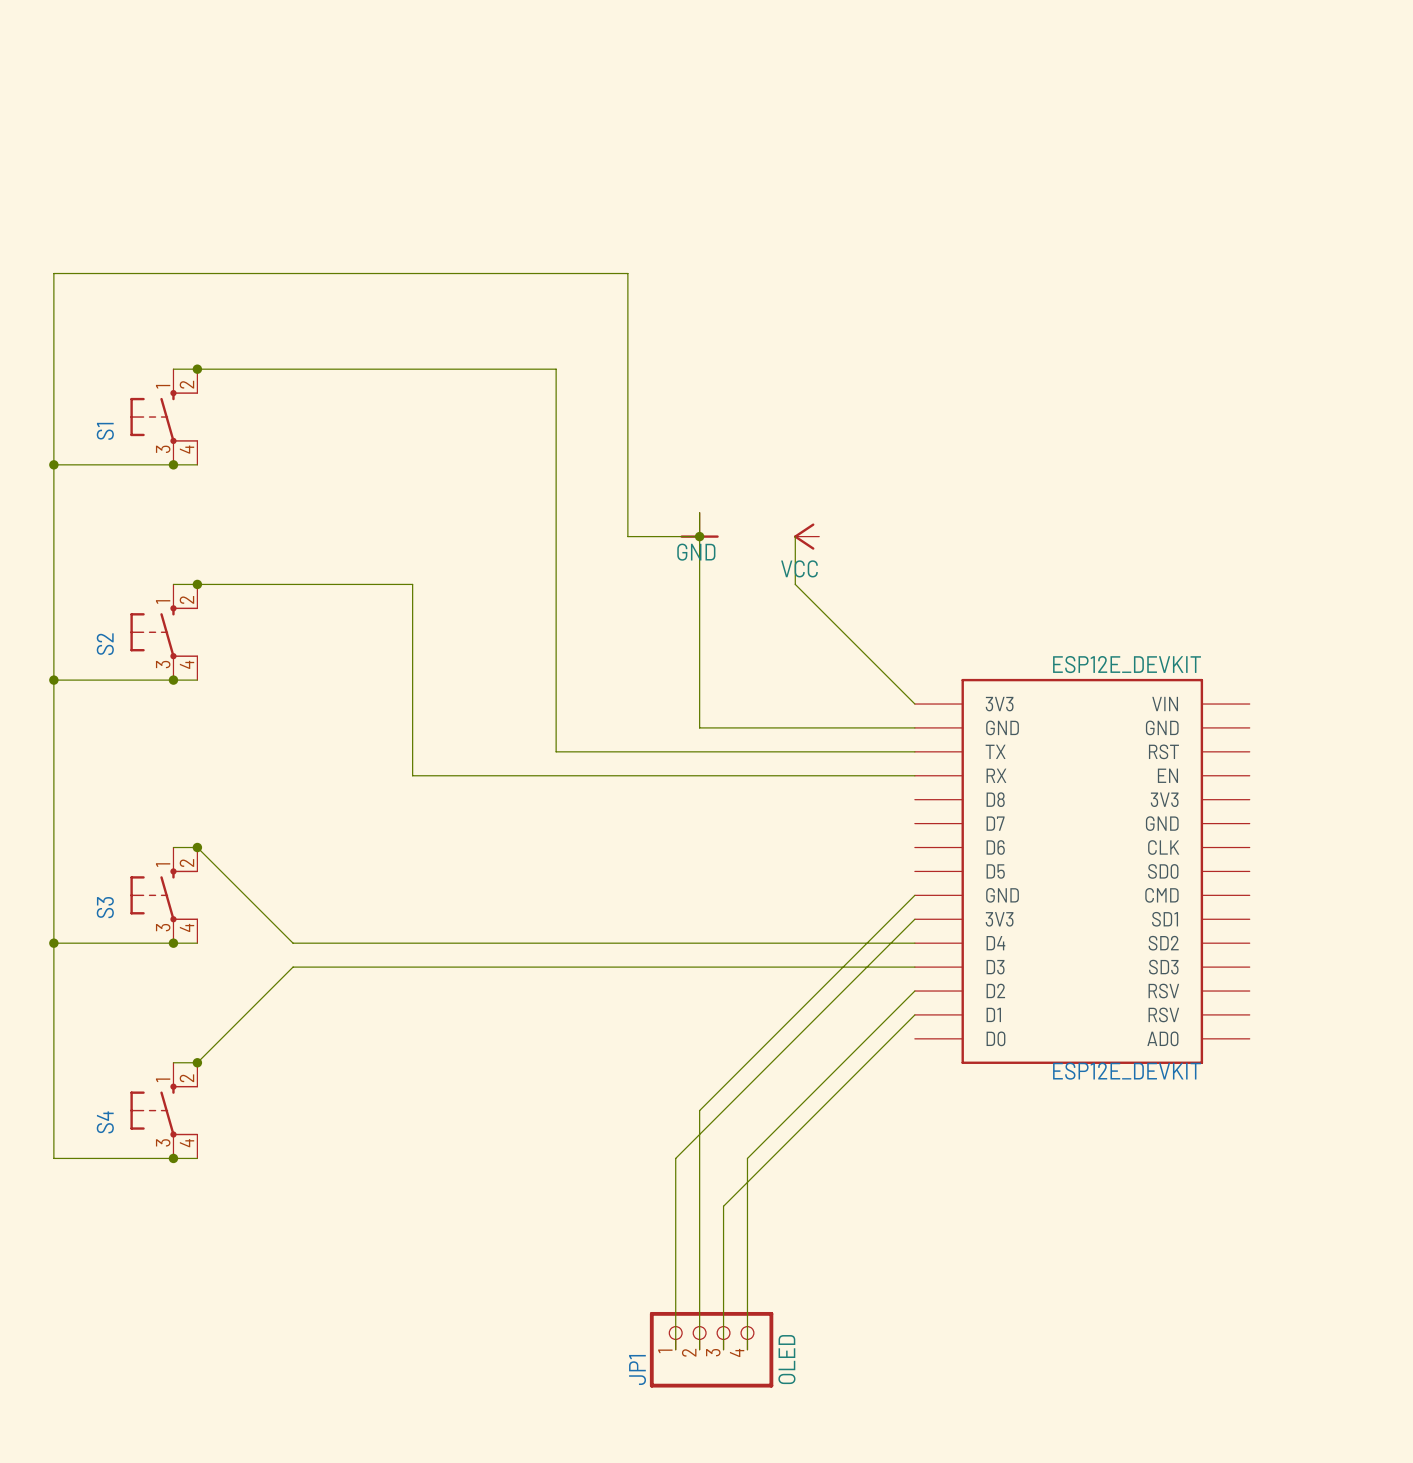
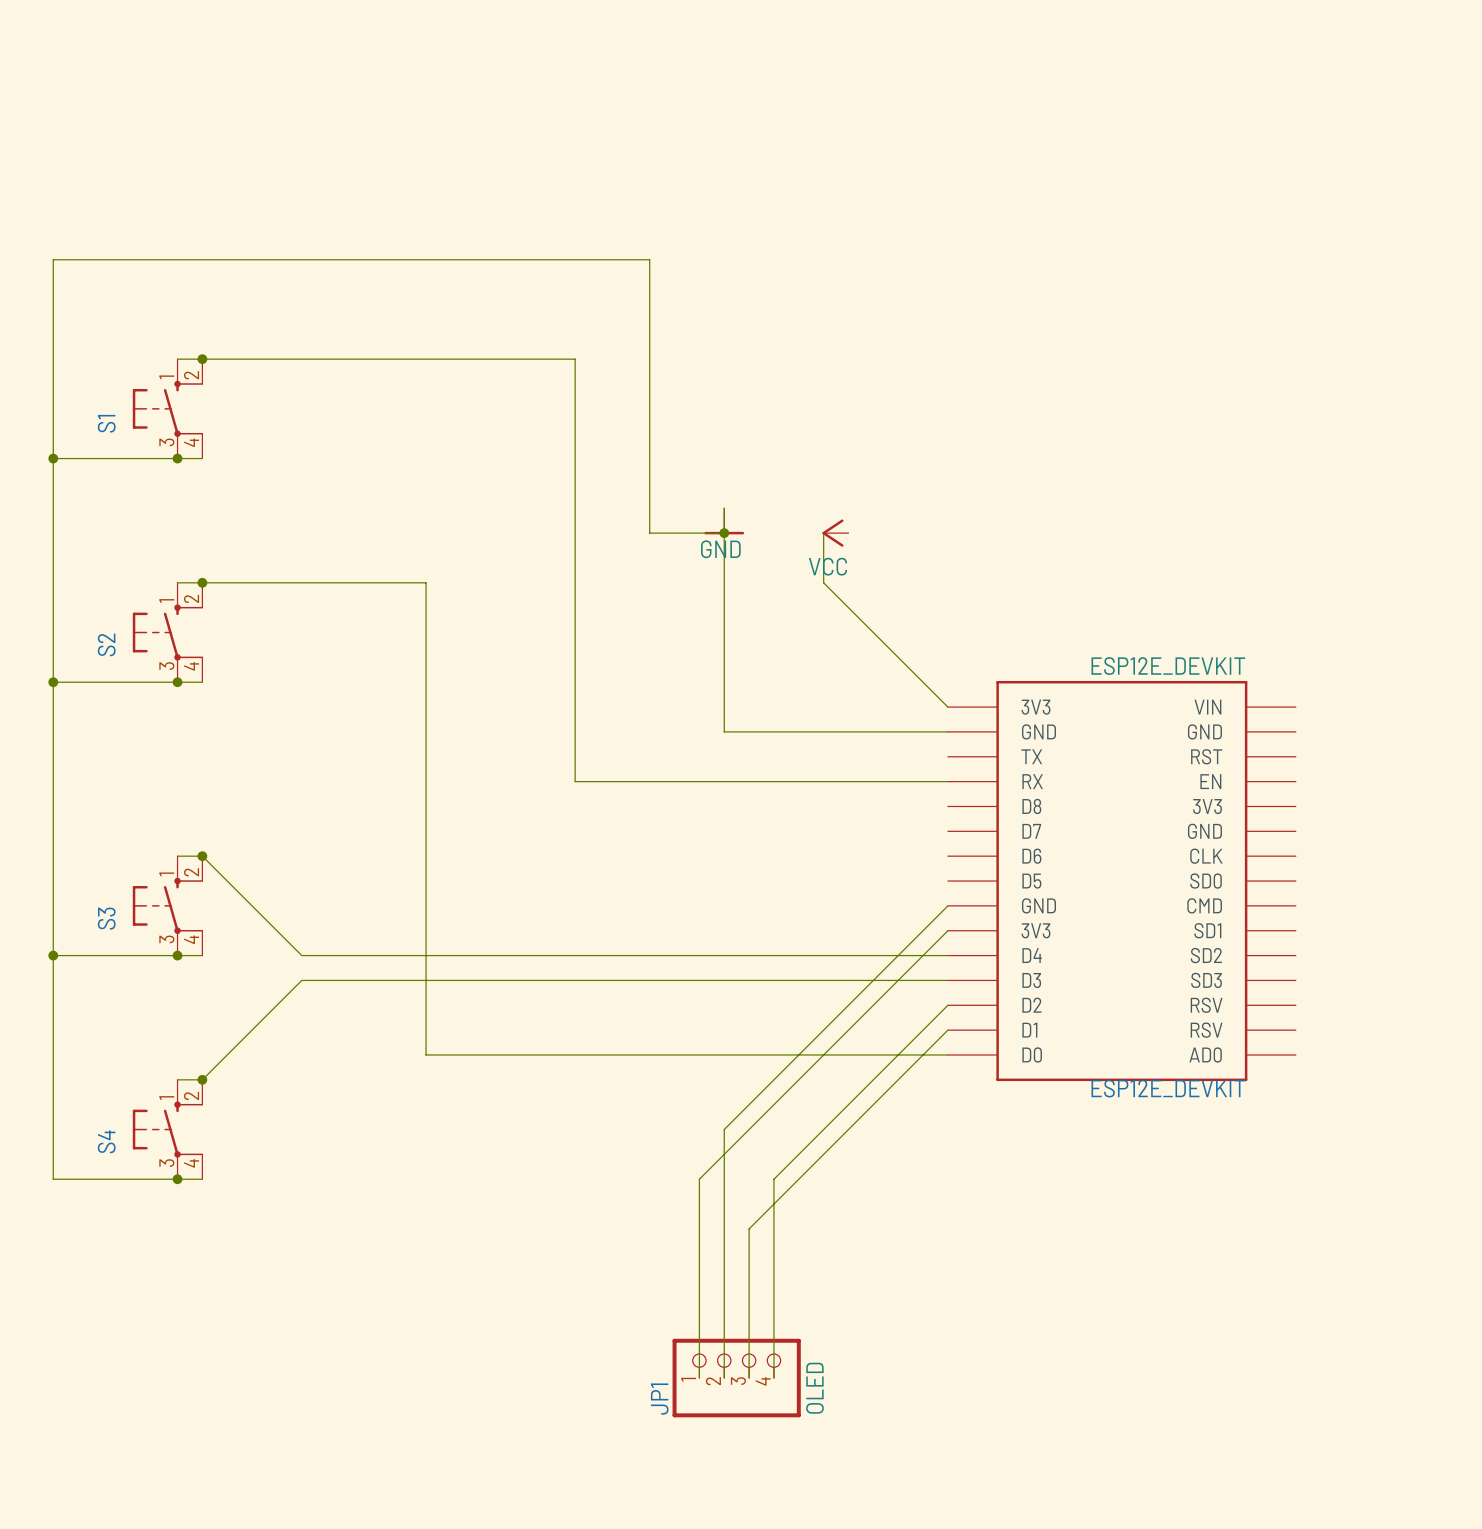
wire: (556, 751) (914, 751) -> none
wire: (412, 775) (556, 775) -> (575, 756) (575, 781)
wire: none -> (426, 781) (426, 1054) (947, 1054)

